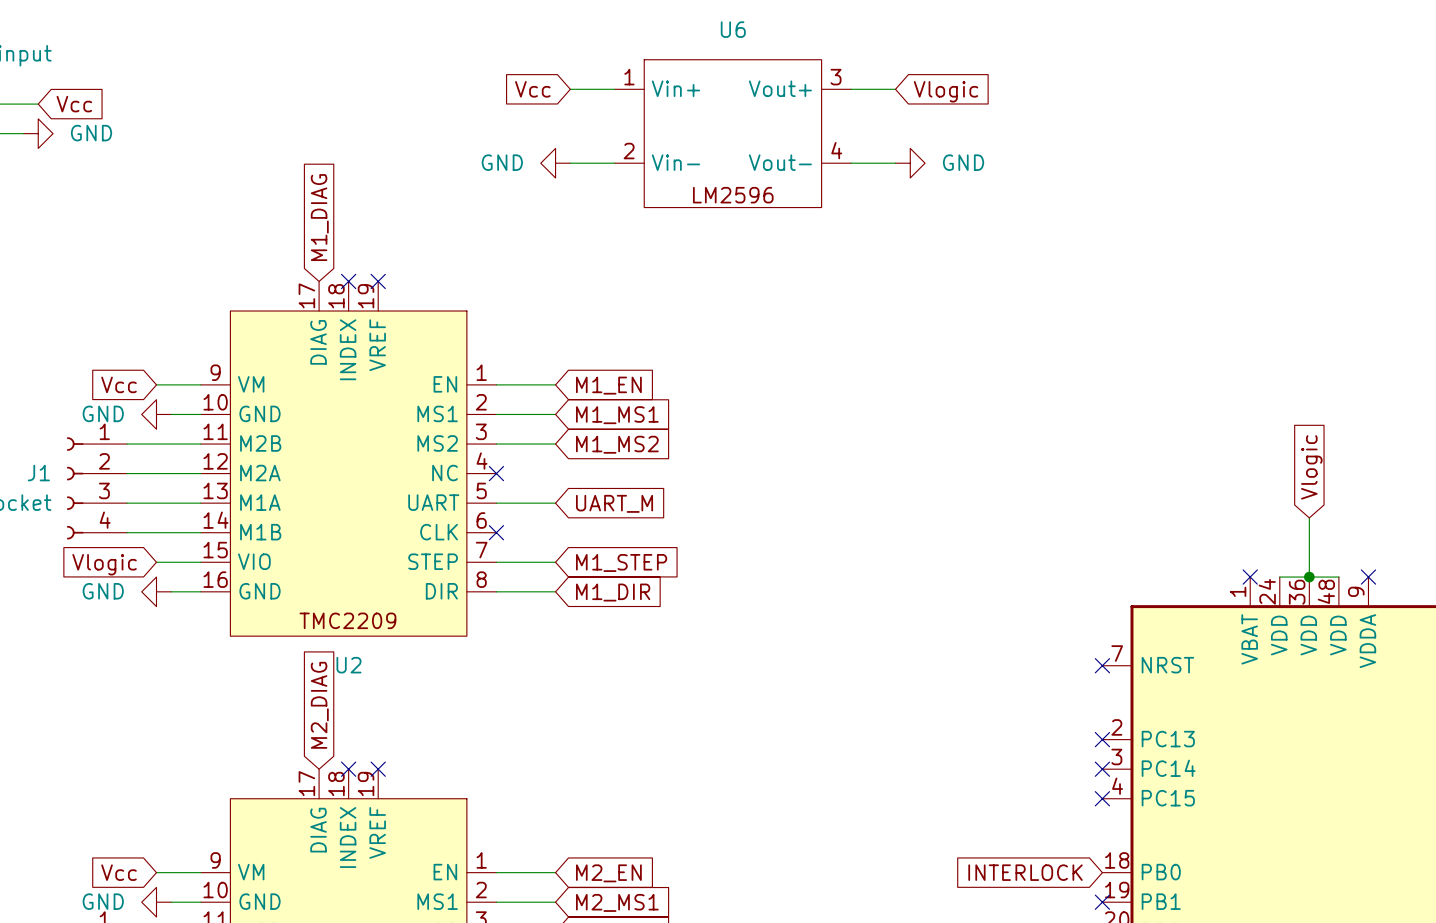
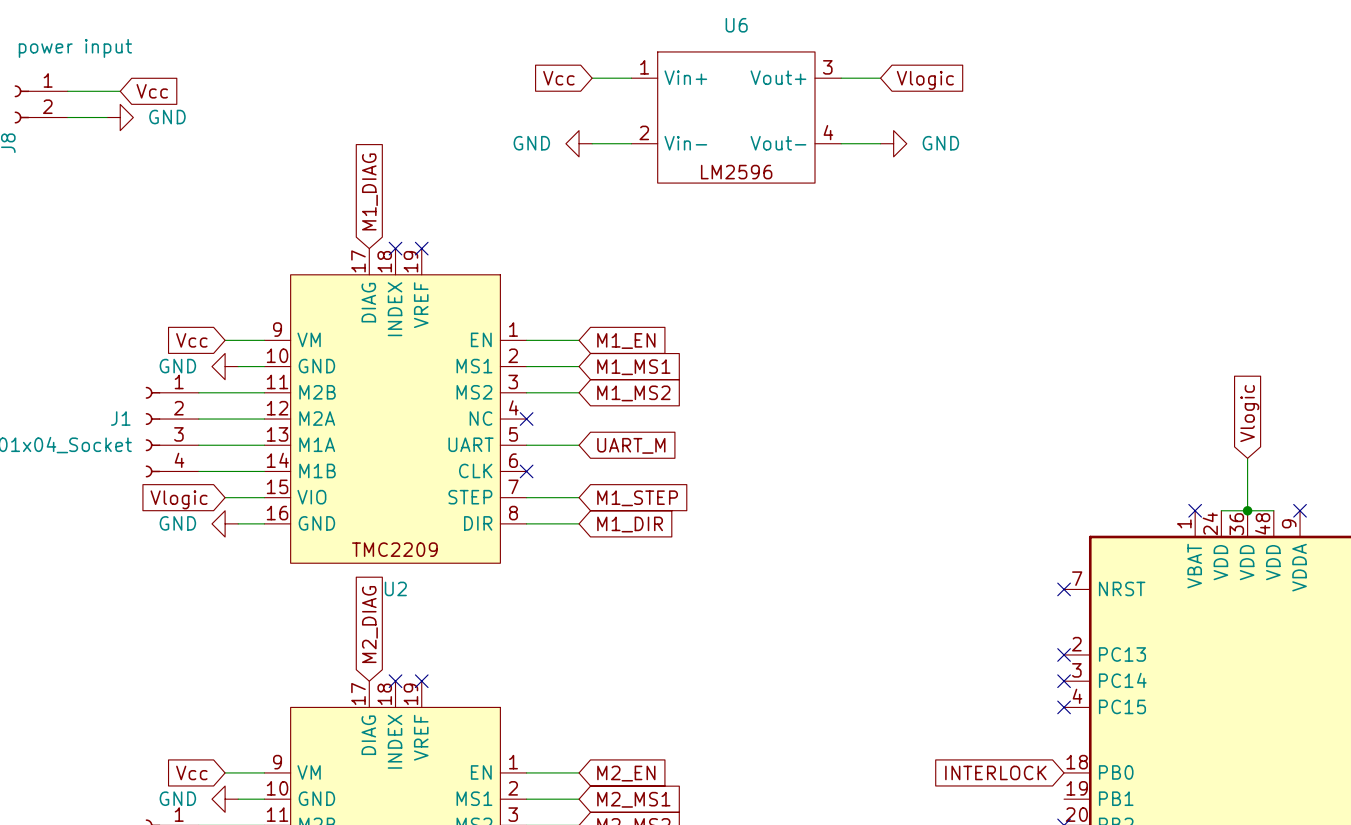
no-connect mark: (1102, 902) -> none

